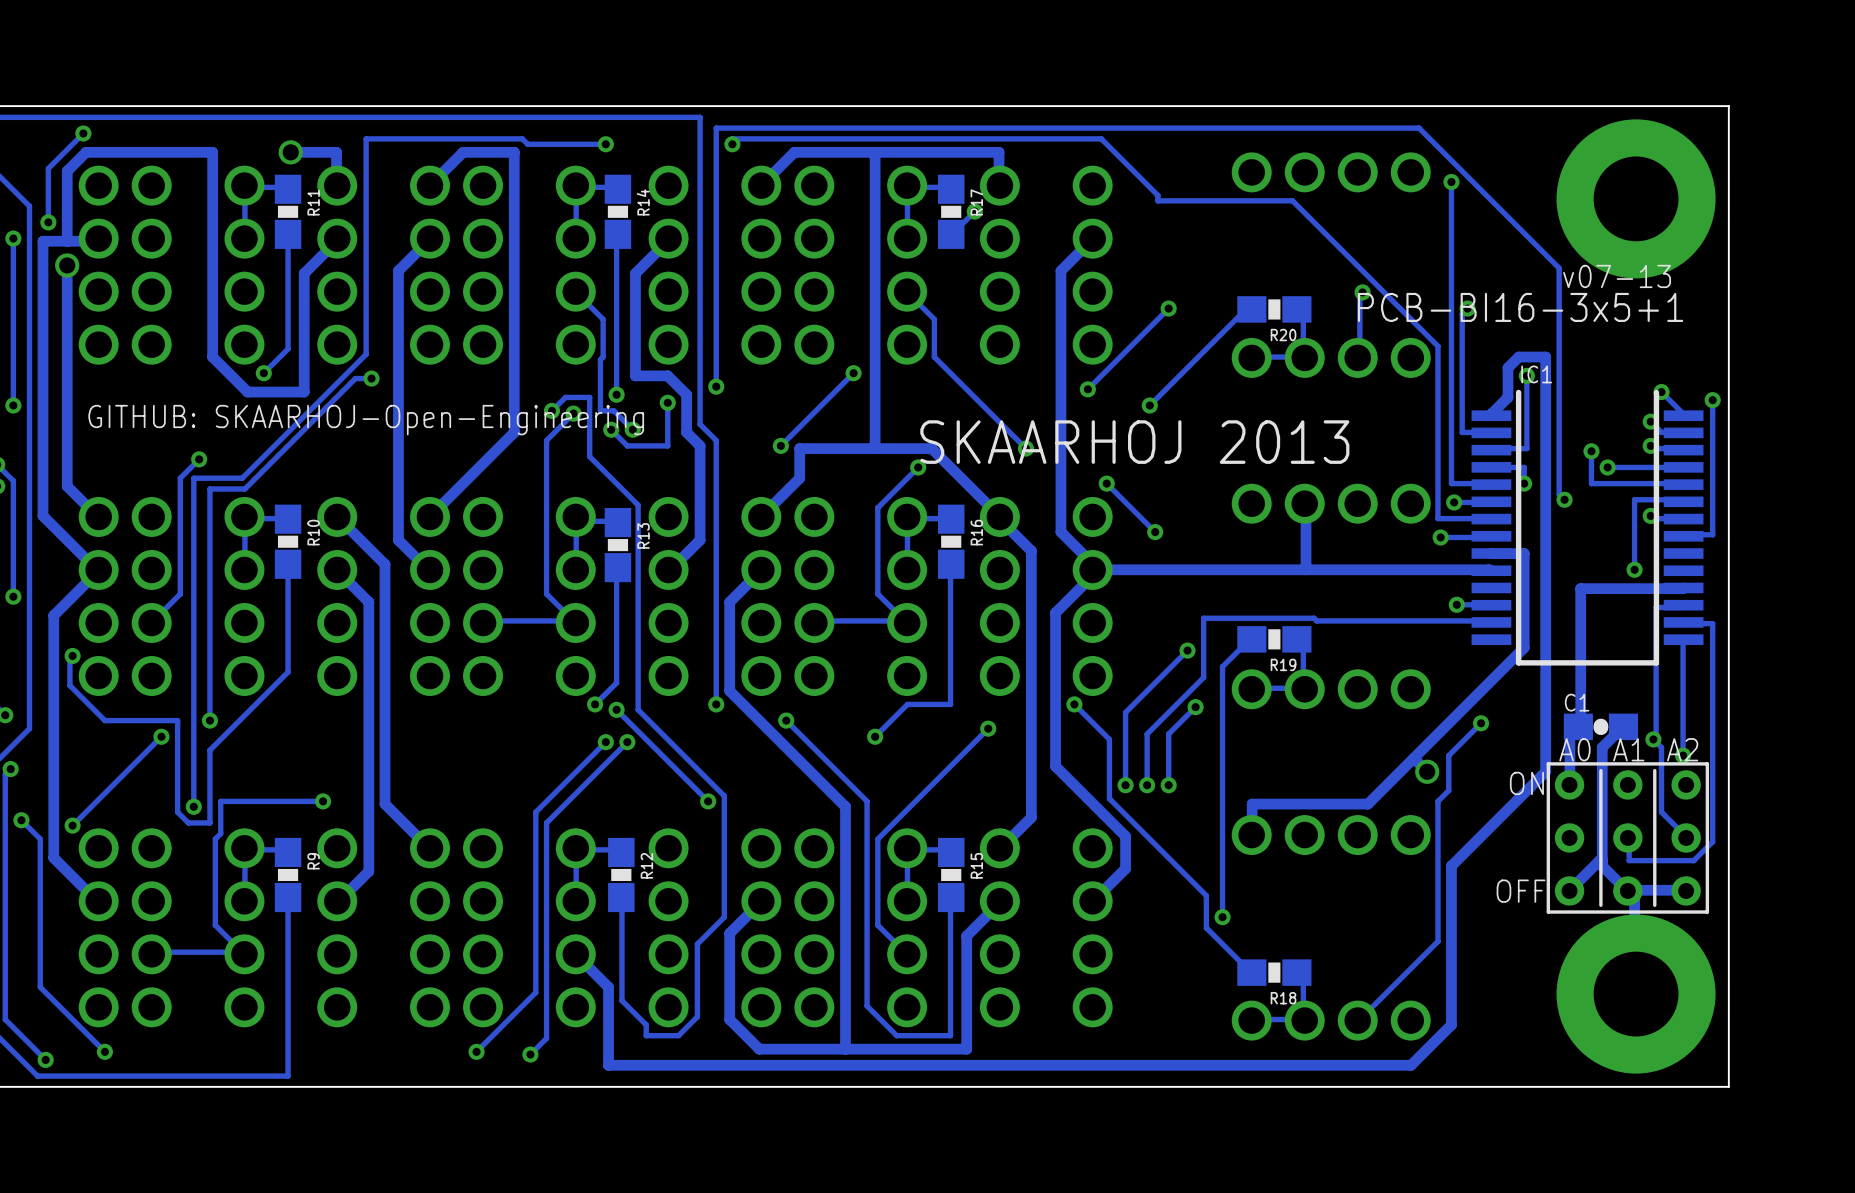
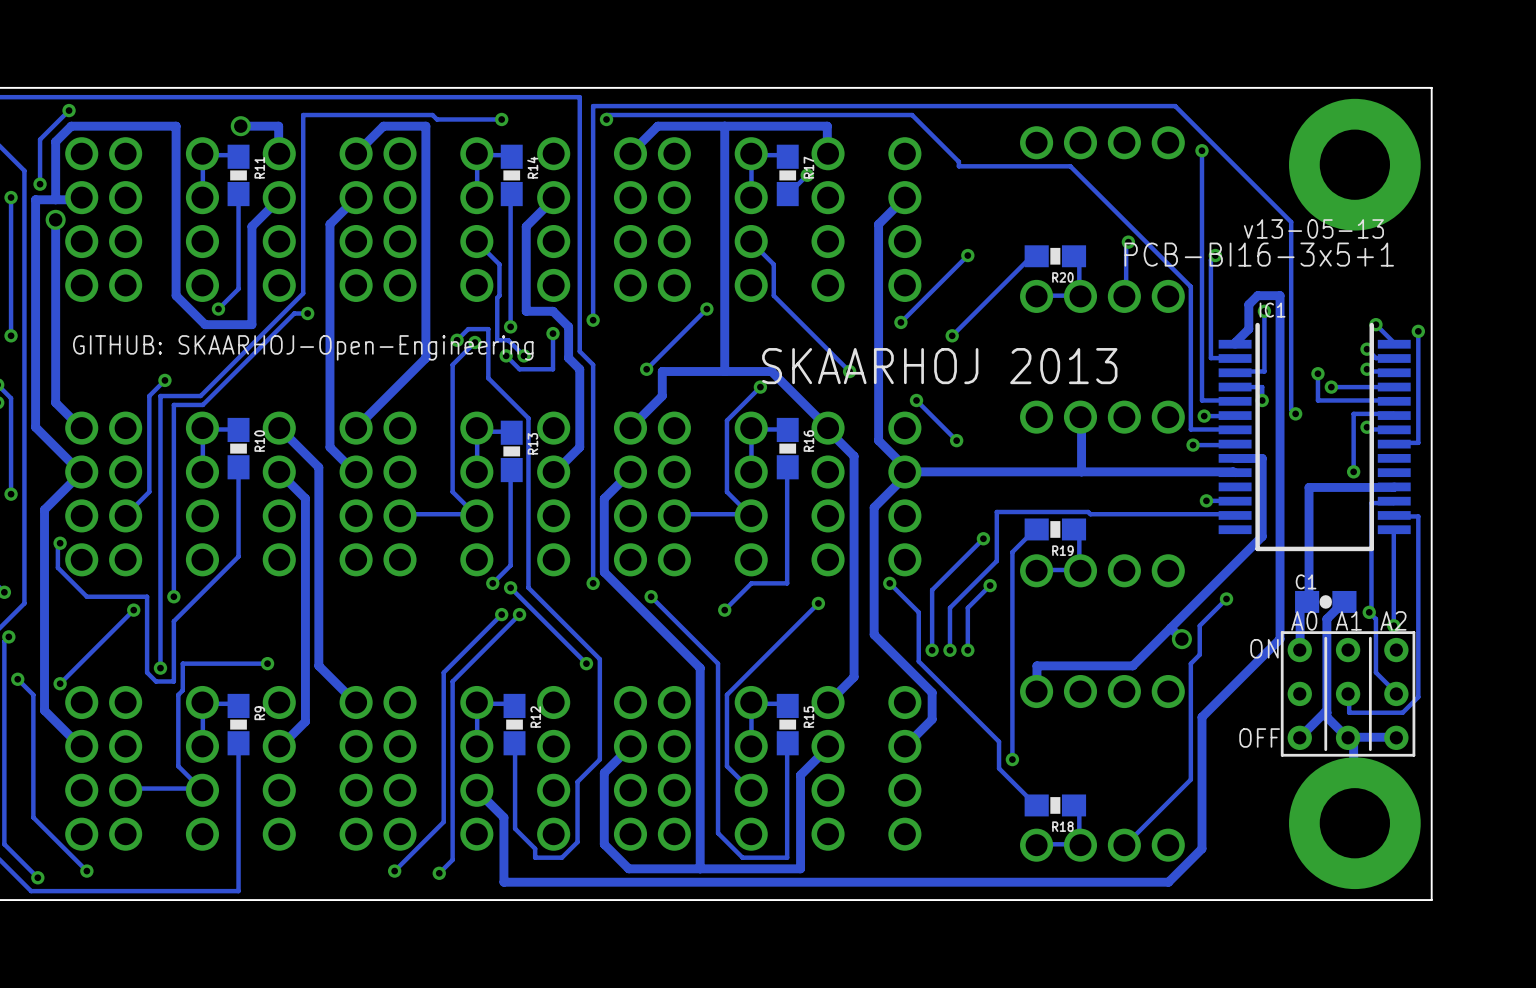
text: v07-13 (1617, 276) -> v13-05-13 (1313, 228)

